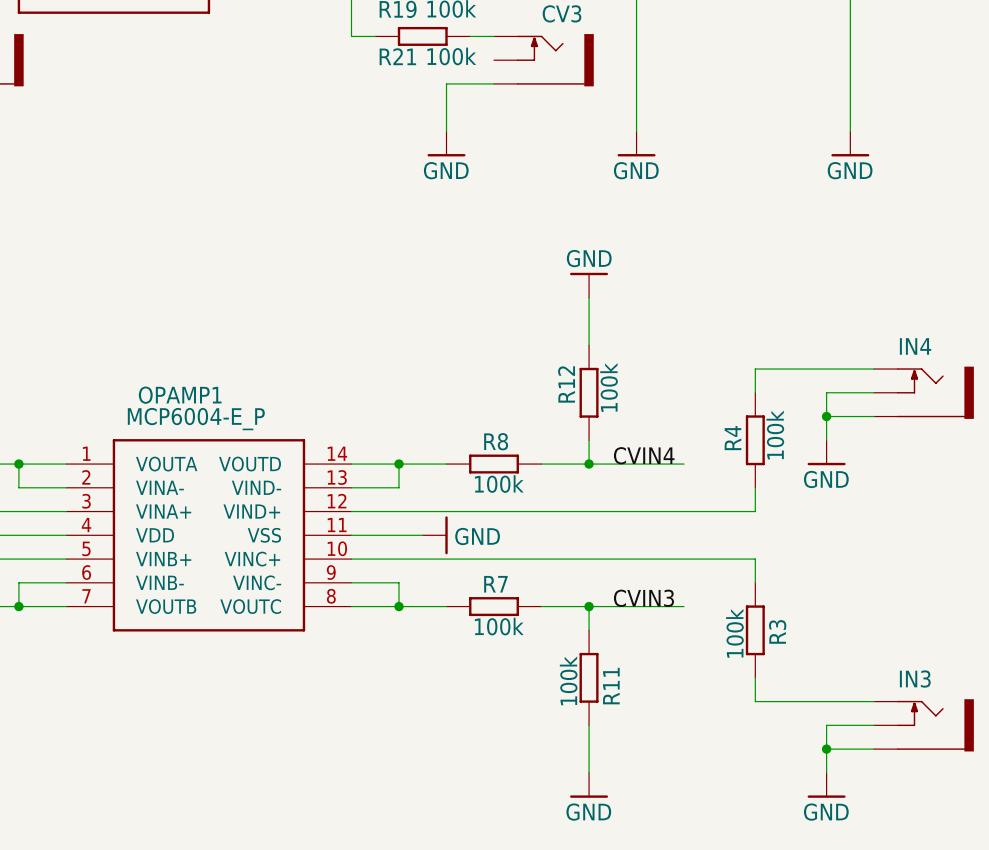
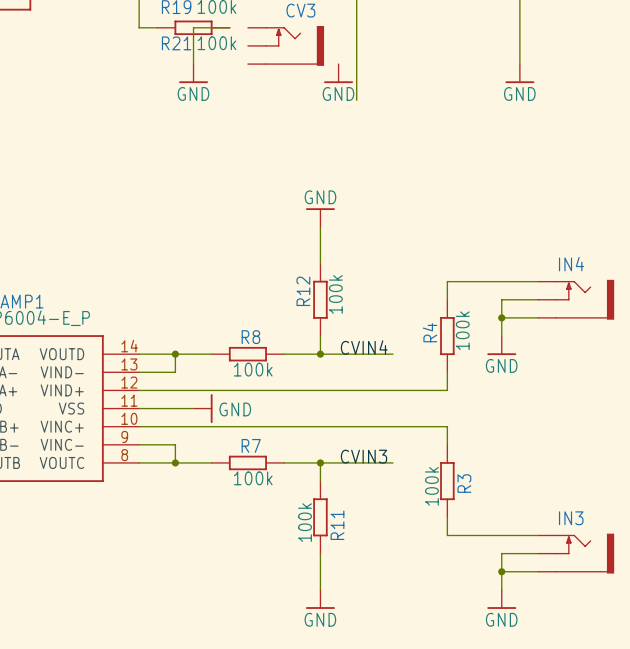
wire: (470, 36) (494, 36) -> (229, 27) (193, 27) (193, 64)
wire: (494, 83) (446, 83) (446, 131) -> none
power symbol position: GND (446, 143) -> GND (193, 73)
power symbol position: GND (636, 143) -> GND (338, 73)
power symbol position: GND (850, 143) -> GND (519, 73)

